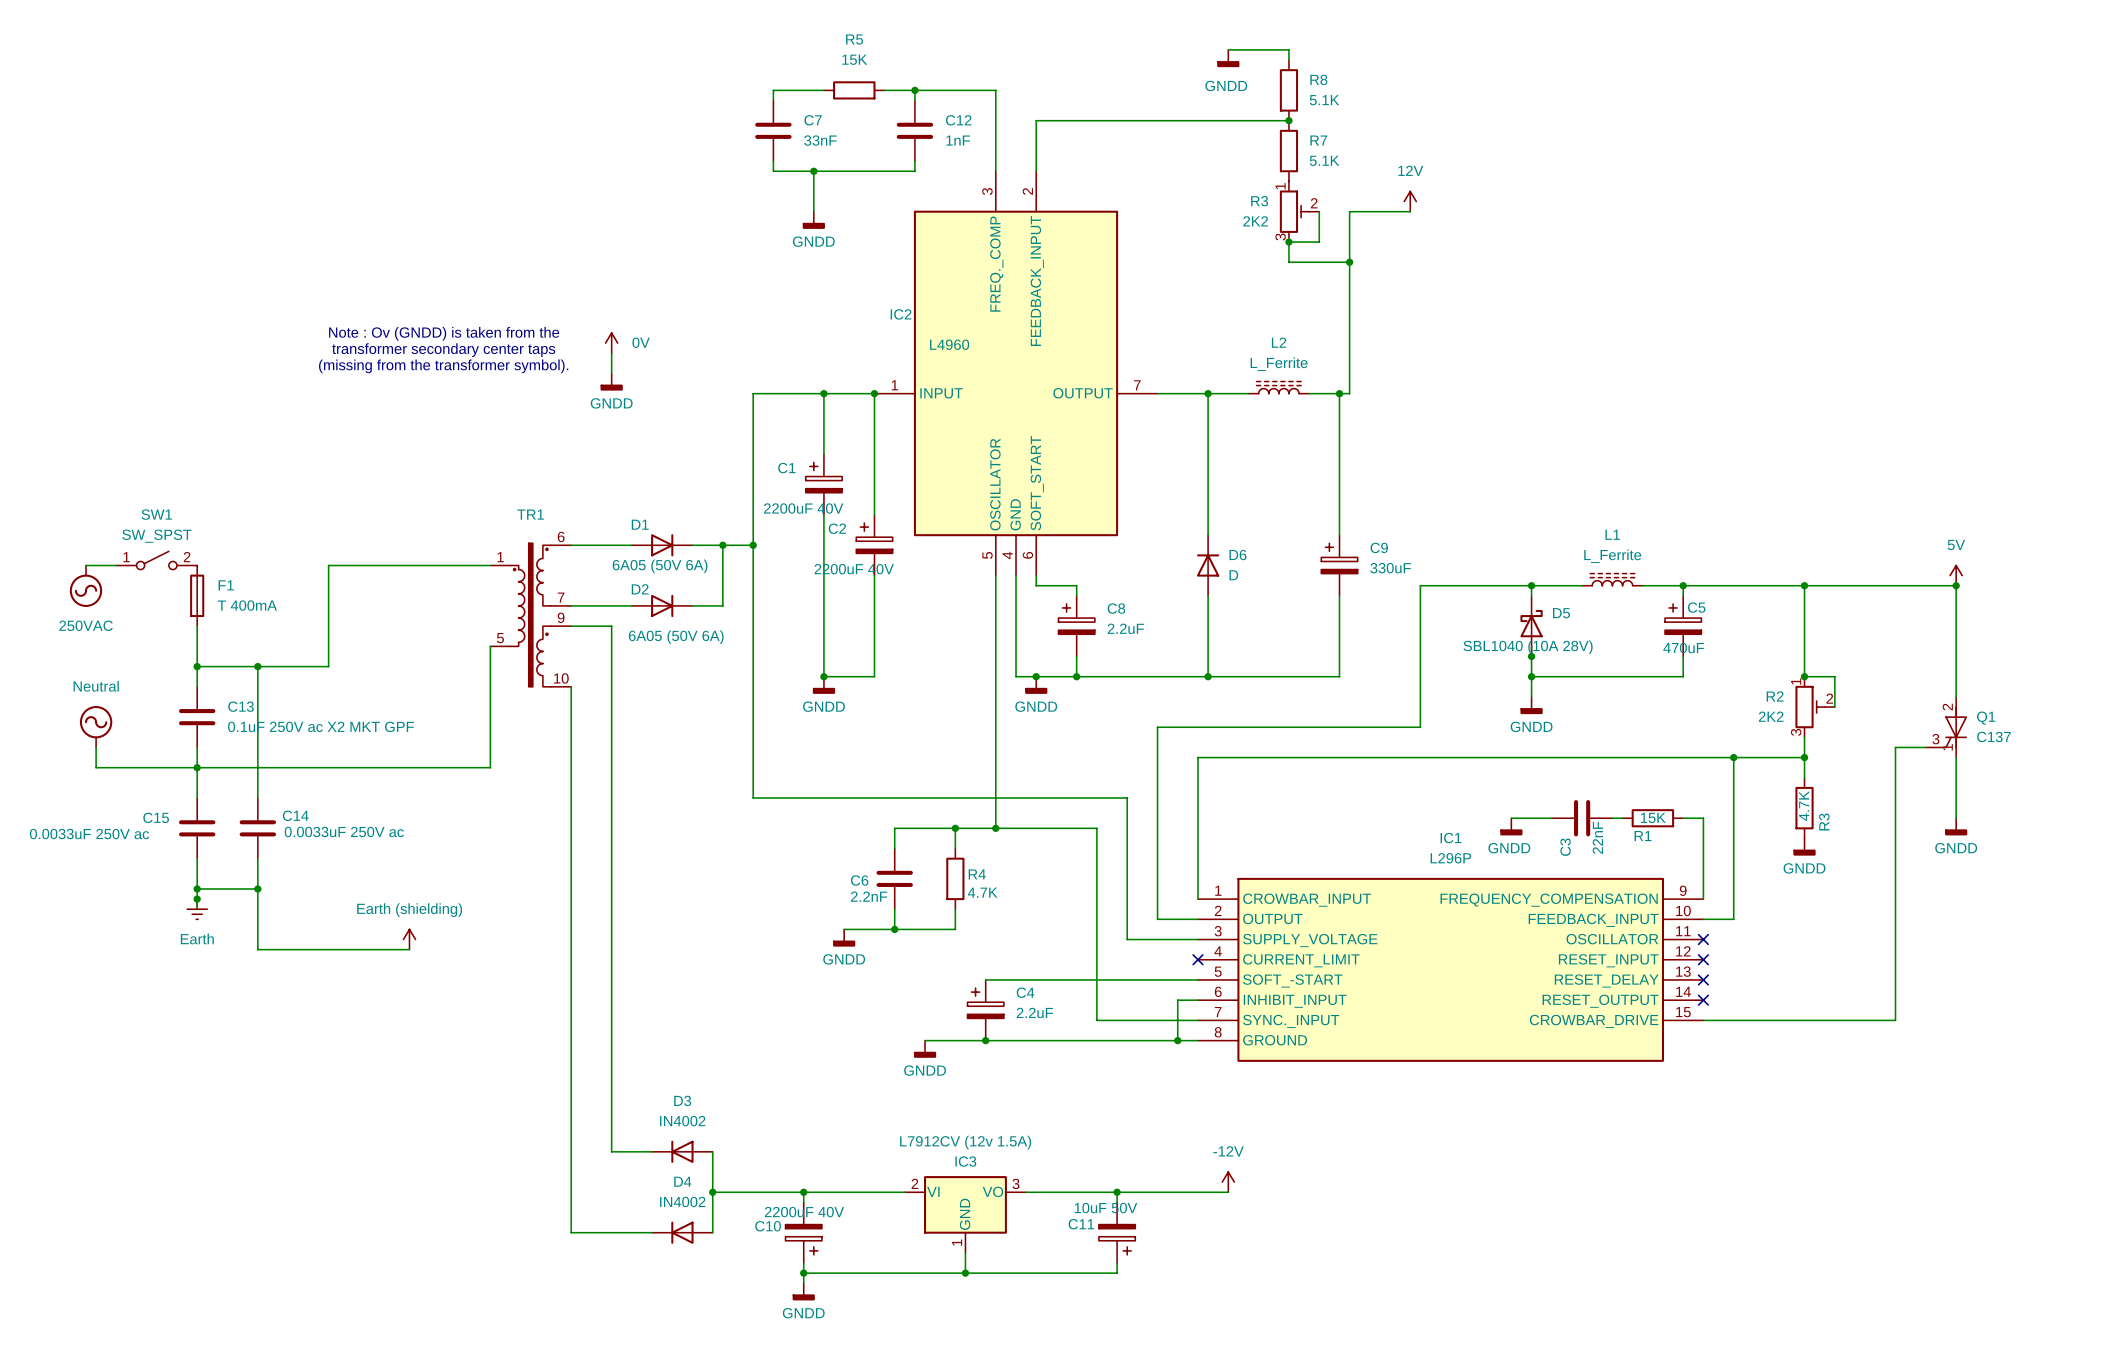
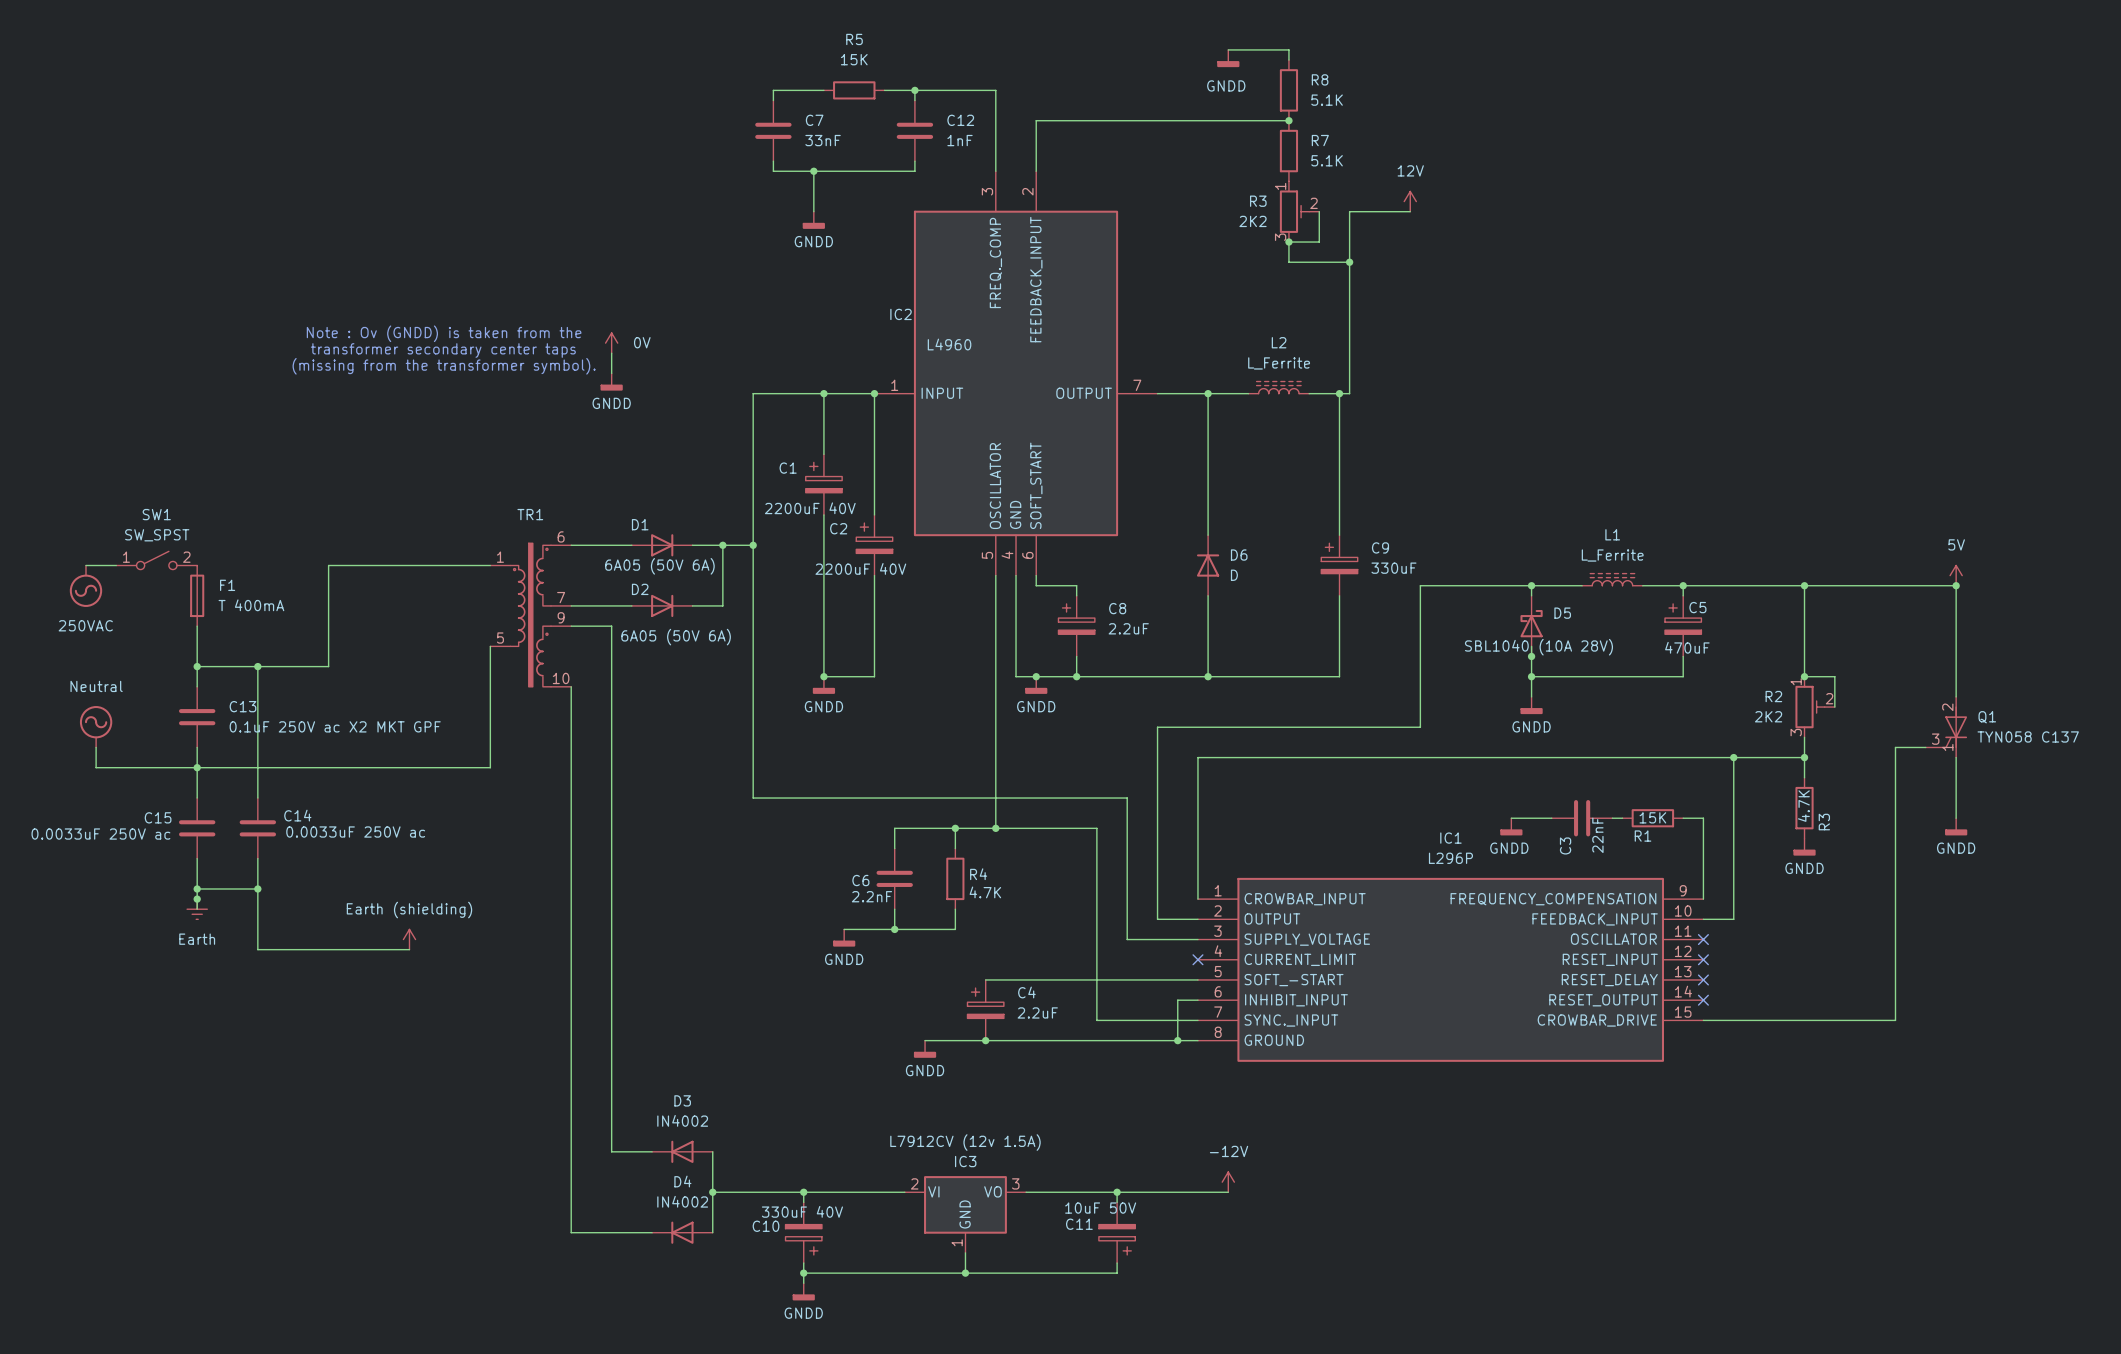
Q1 value: C137 (1993, 736) -> TYN058 C137 (2028, 736)
C10 value: 2200uF 40V (804, 1212) -> 330uF 40V (802, 1211)

